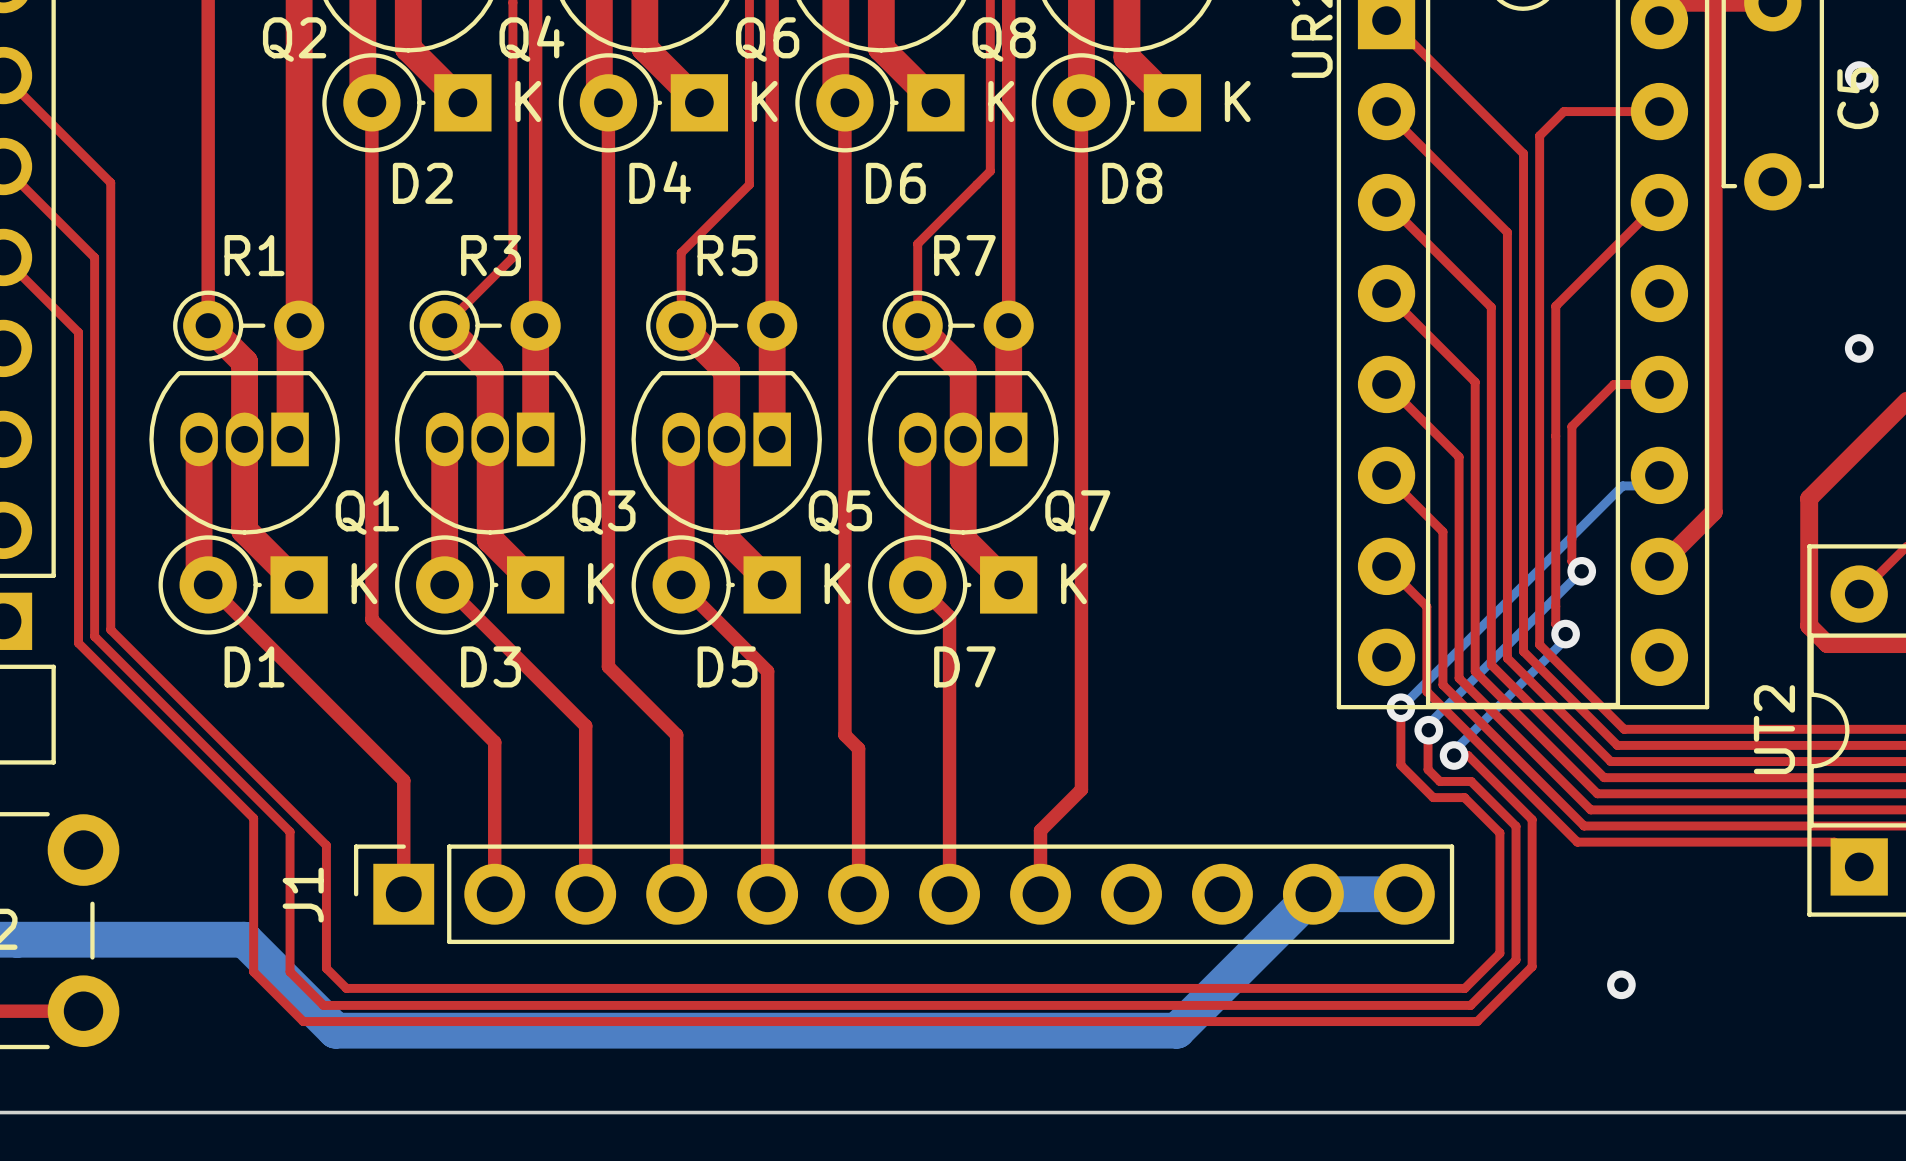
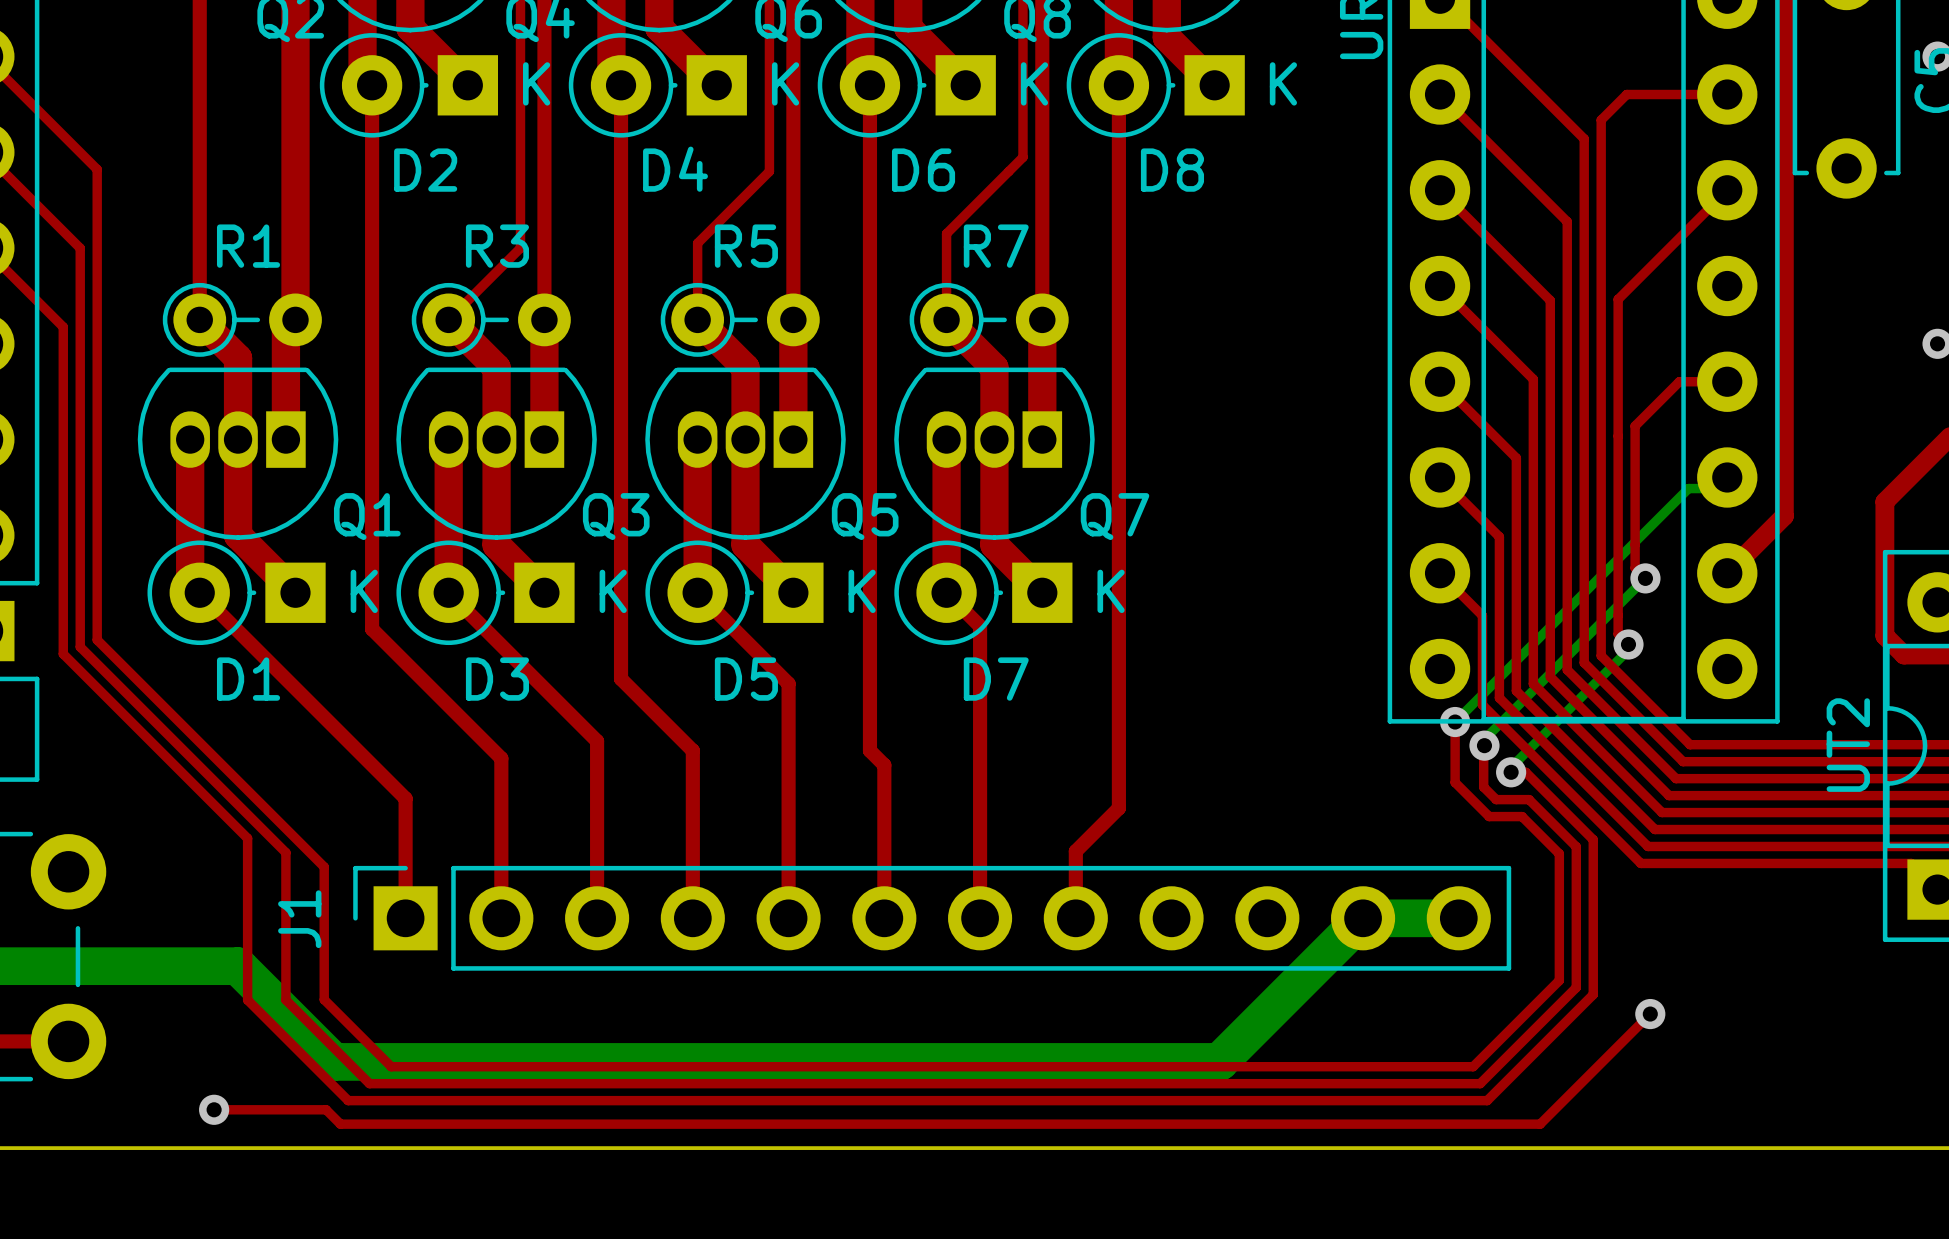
top track: (326, 968) (346, 988) (1464, 988) -> (324, 996) (324, 999) (391, 1066) (1473, 1066) (1522, 1017)
via position: (1621, 984) -> (1650, 1014)
top track: none -> (1650, 1014) (1540, 1124) (340, 1124) (326, 1109) (214, 1109)
top track: (323, 1005) (1470, 1005) -> (321, 1035) (369, 1083) (1480, 1083) (1528, 1035)
top track: (303, 1021) (1477, 1021) -> (299, 1052) (348, 1100) (1487, 1100) (1535, 1052)
via: none -> (214, 1109)

